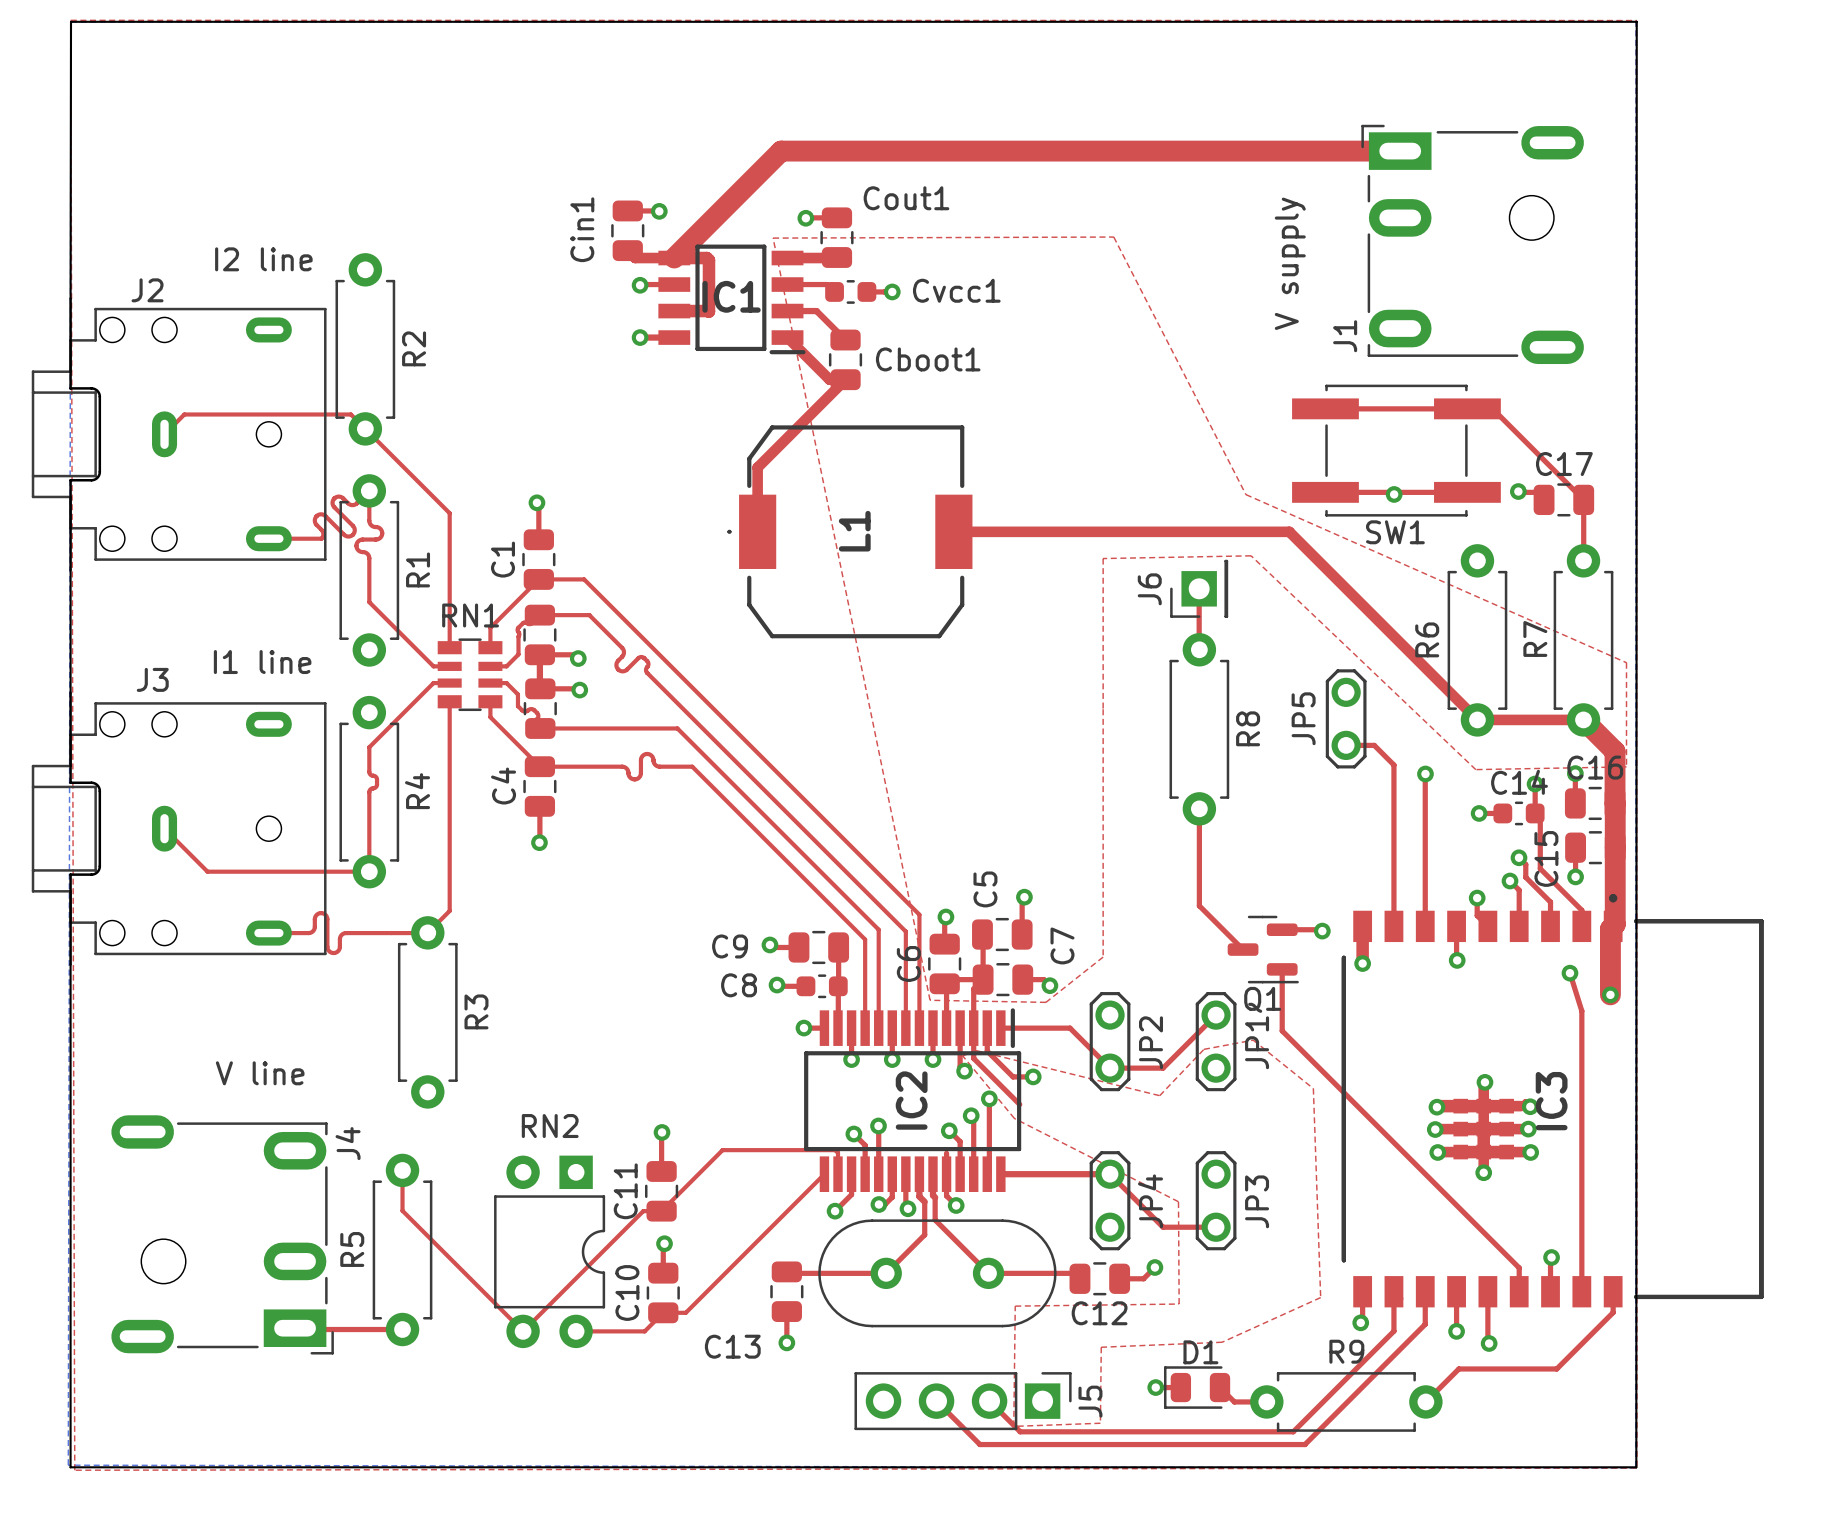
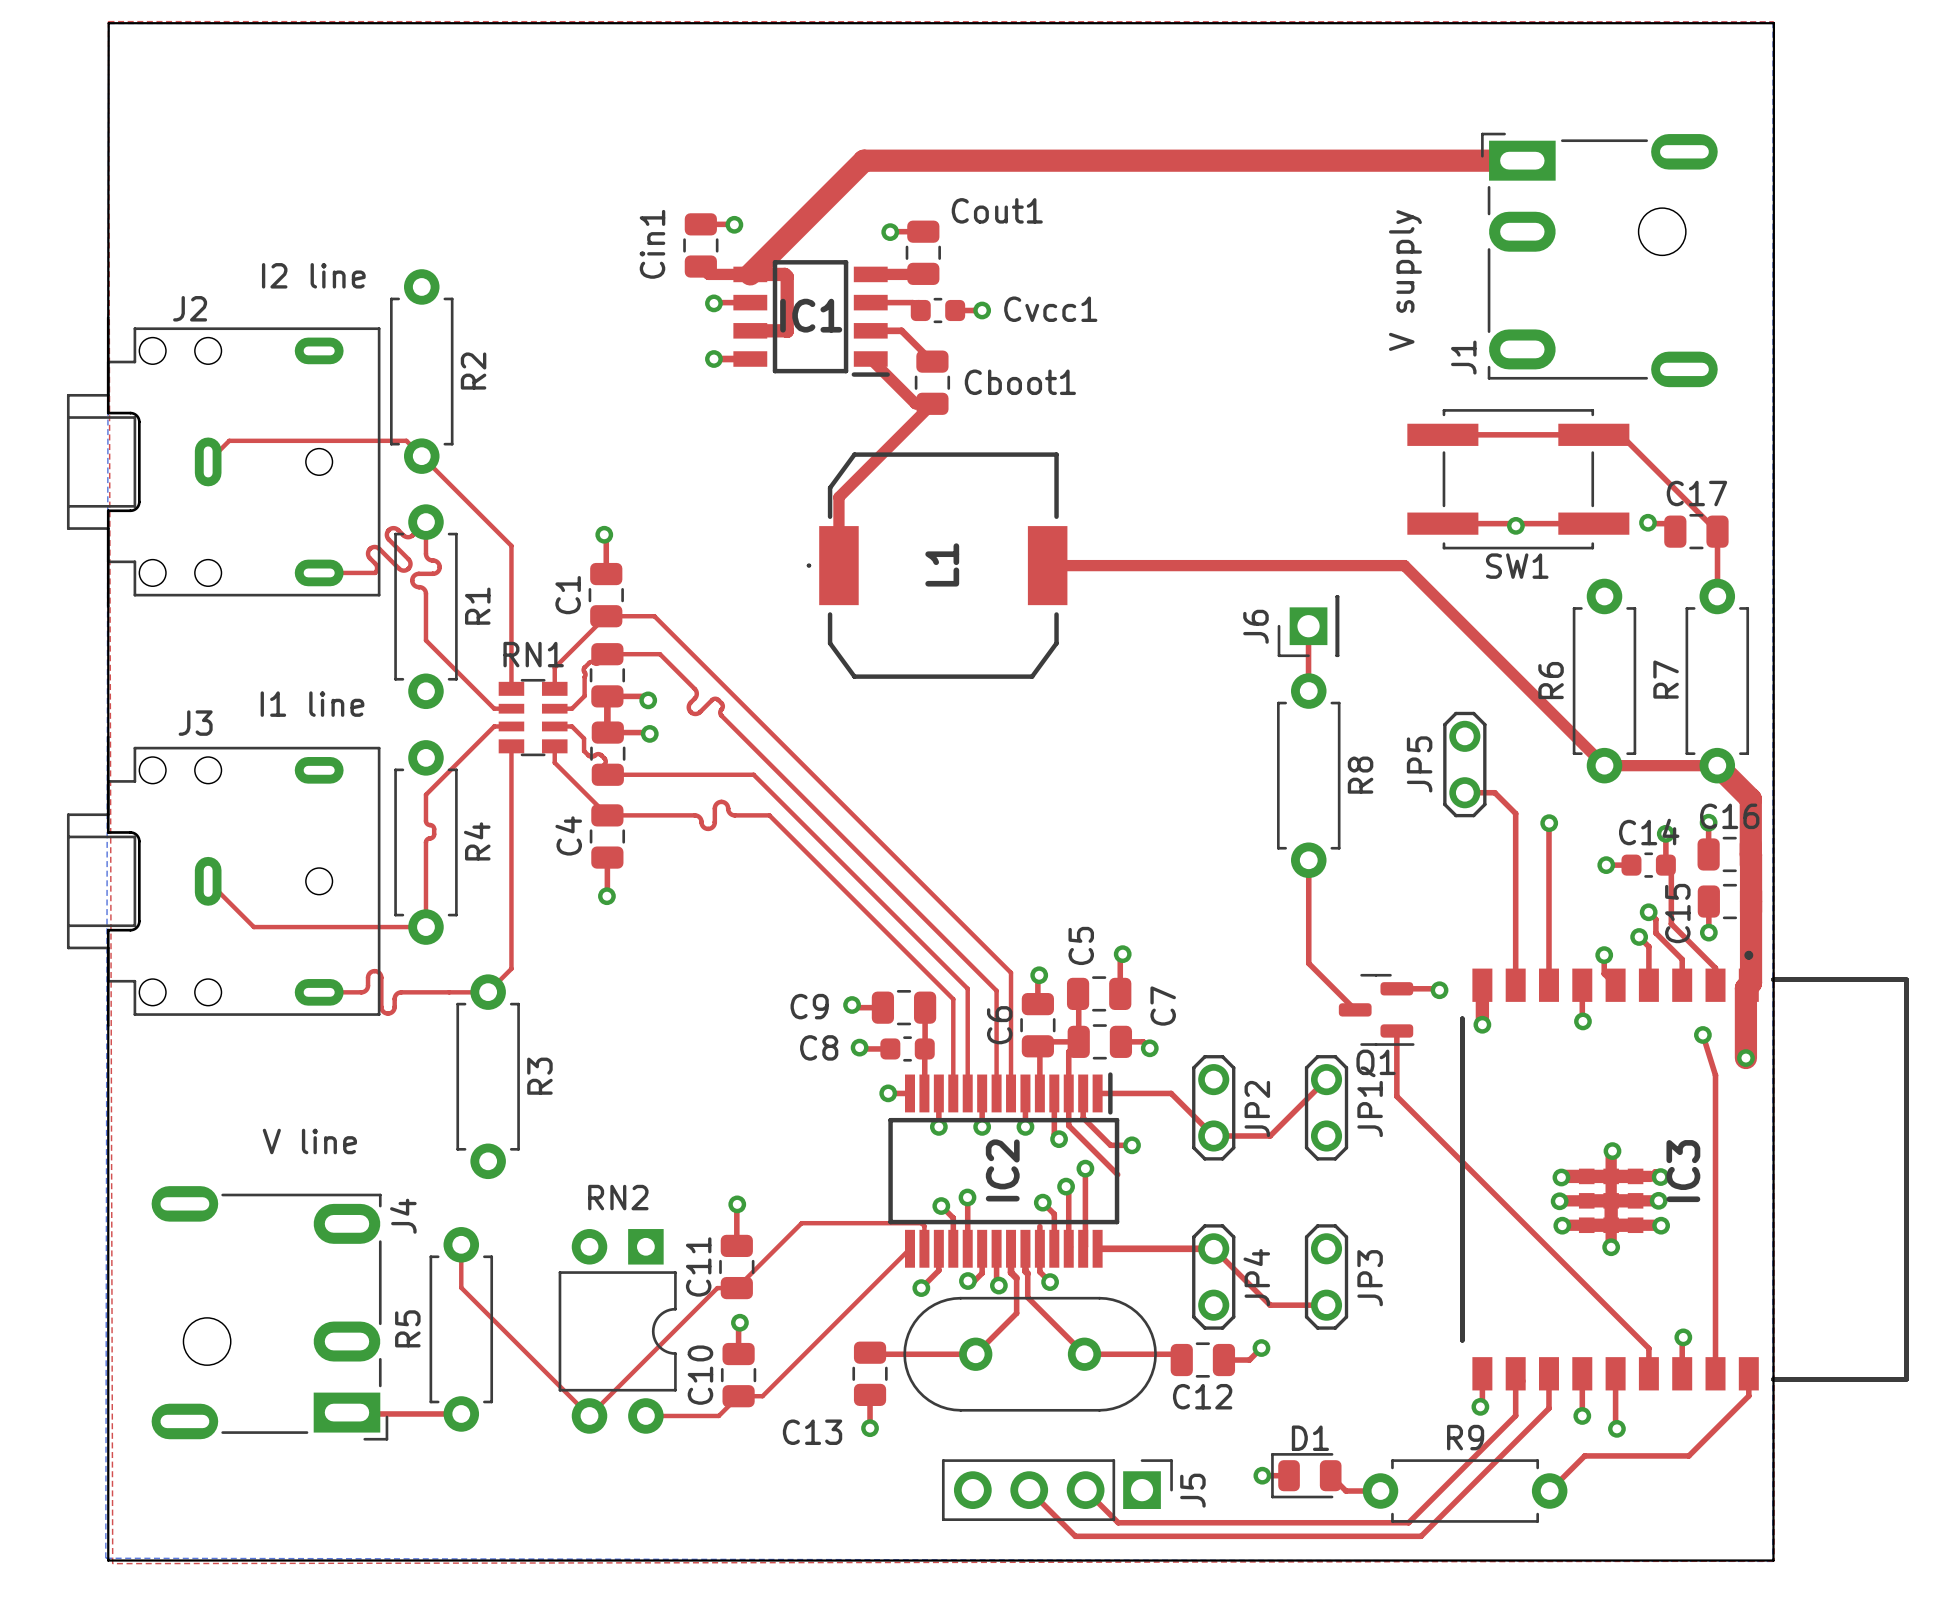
top zone outline: (1113, 237) (773, 238) (930, 1000) (1045, 1002) (1103, 957) (1103, 558) (1251, 555) (1475, 769) (1626, 766) (1626, 662) (1245, 494) (1113, 237) -> none
top zone outline: (1253, 1040) (1203, 1049) (1159, 1095) (976, 1050) (962, 1055) (1014, 1118) (1178, 1201) (1179, 1304) (1015, 1306) (1013, 1426) (1100, 1423) (1101, 1347) (1222, 1342) (1320, 1297) (1313, 1088) (1253, 1040) -> none

